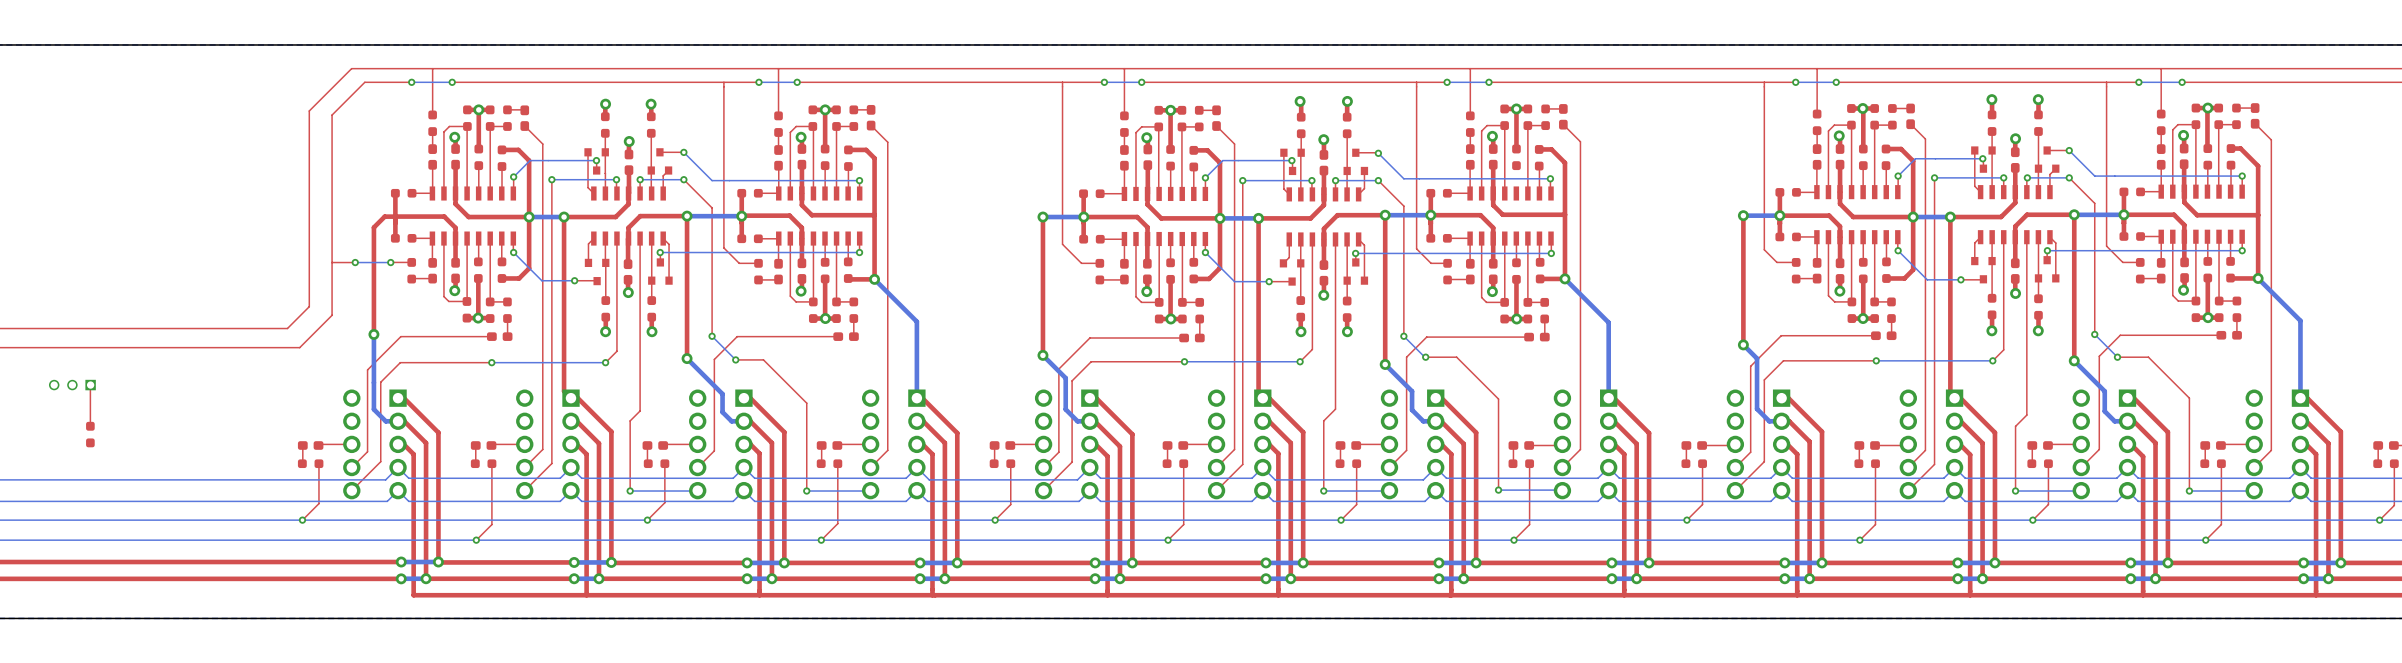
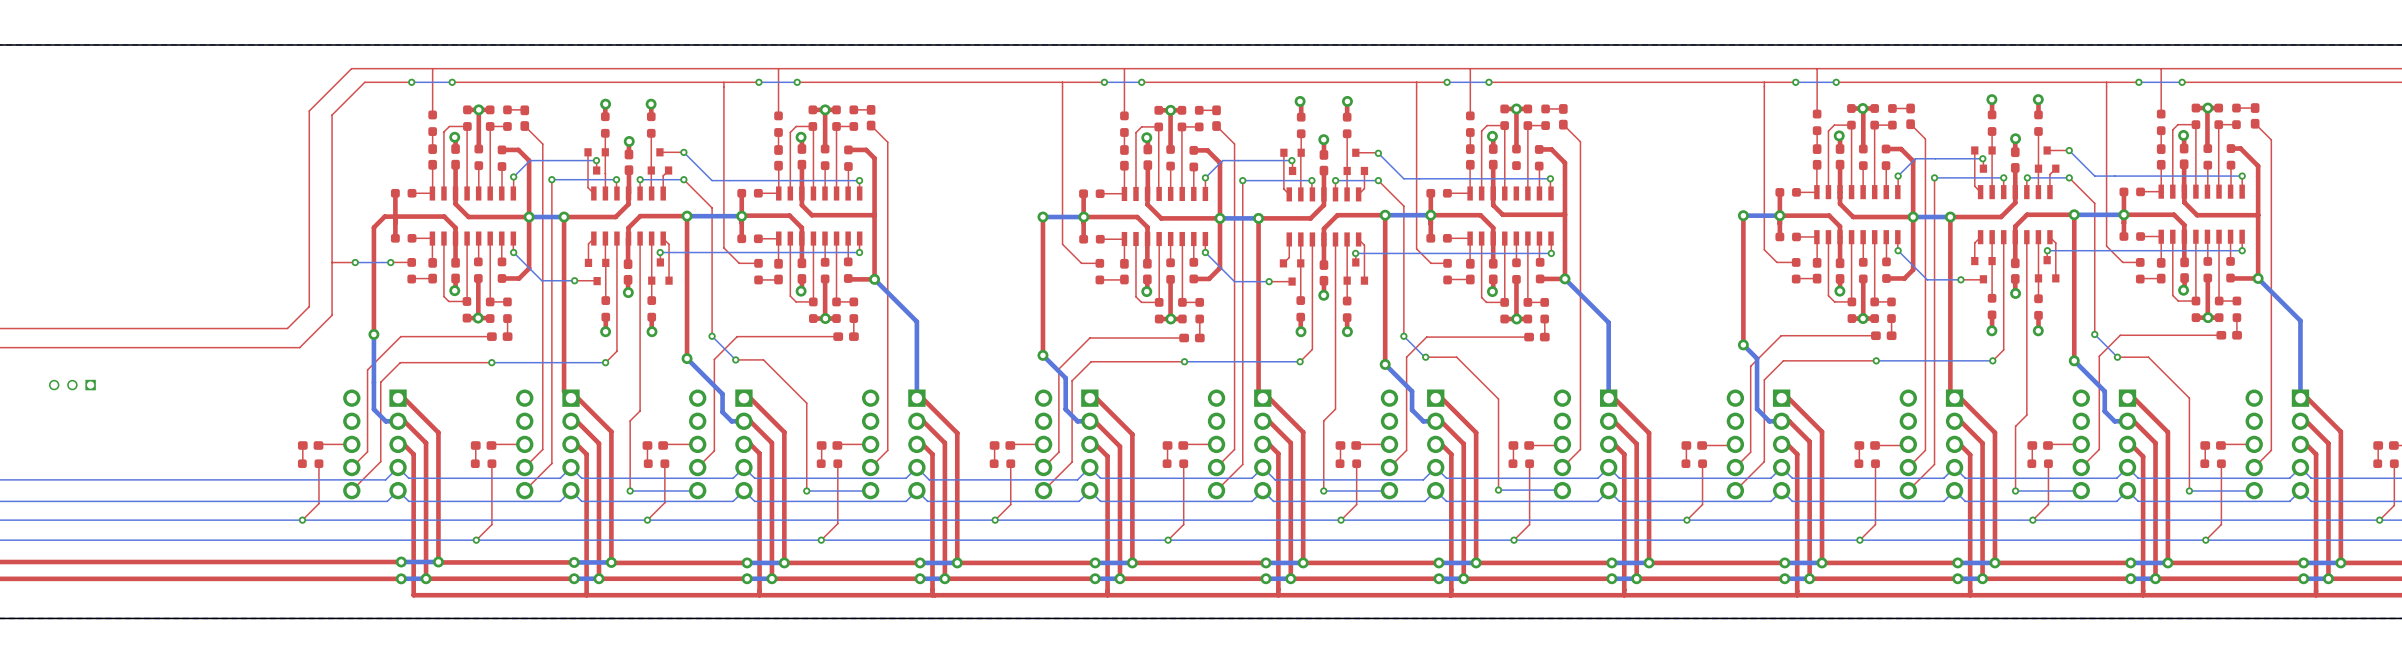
top track: (90, 385) (90, 426) -> none
part: (90, 434) -> none

